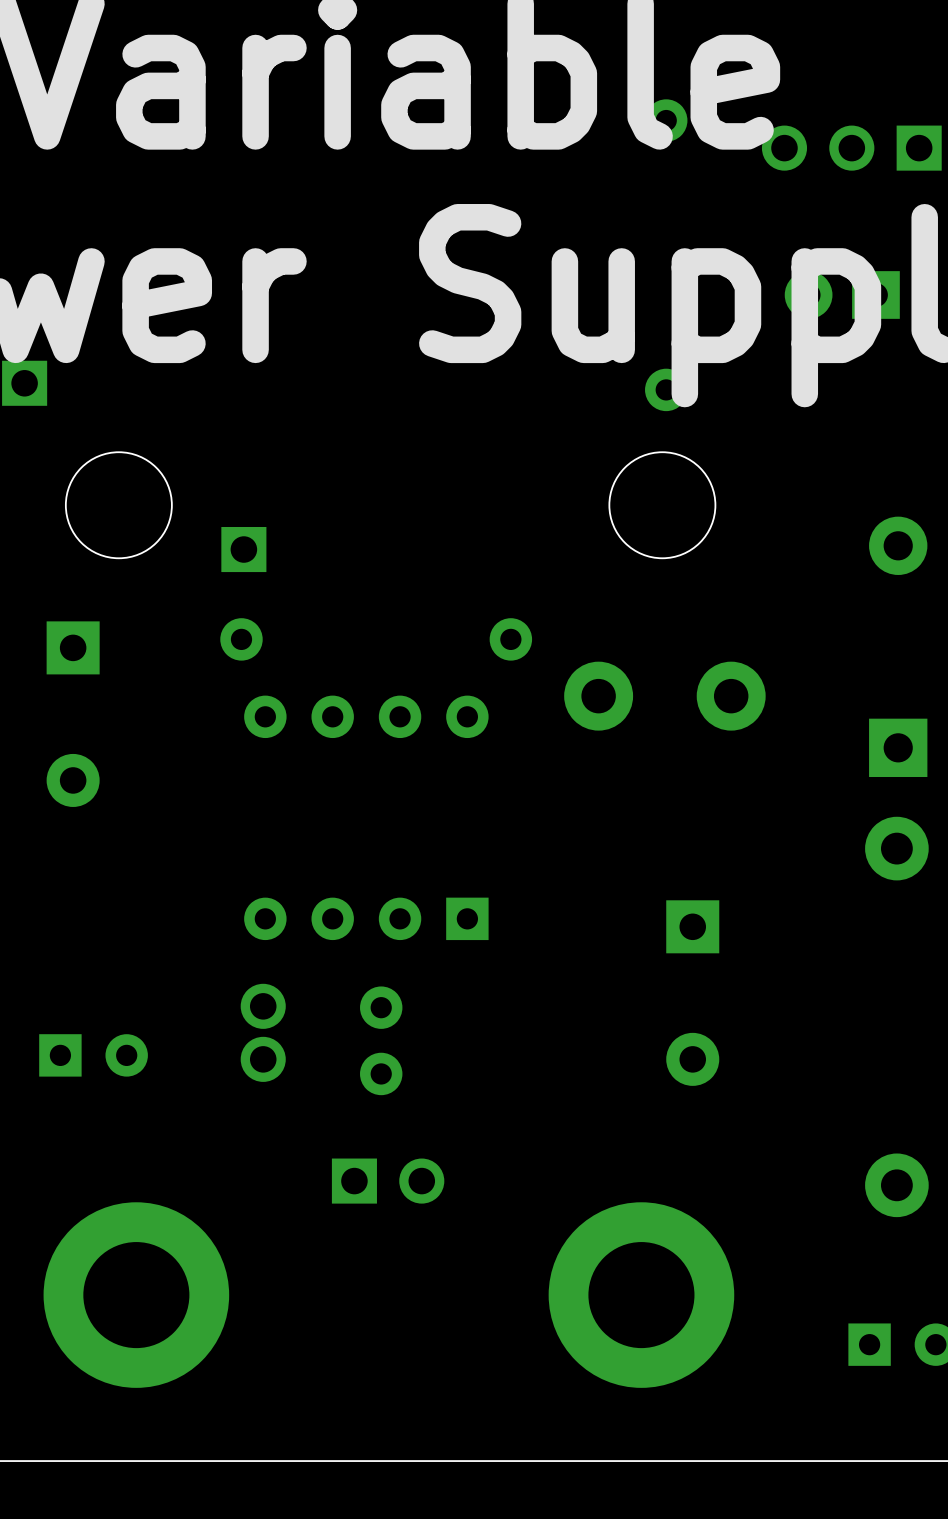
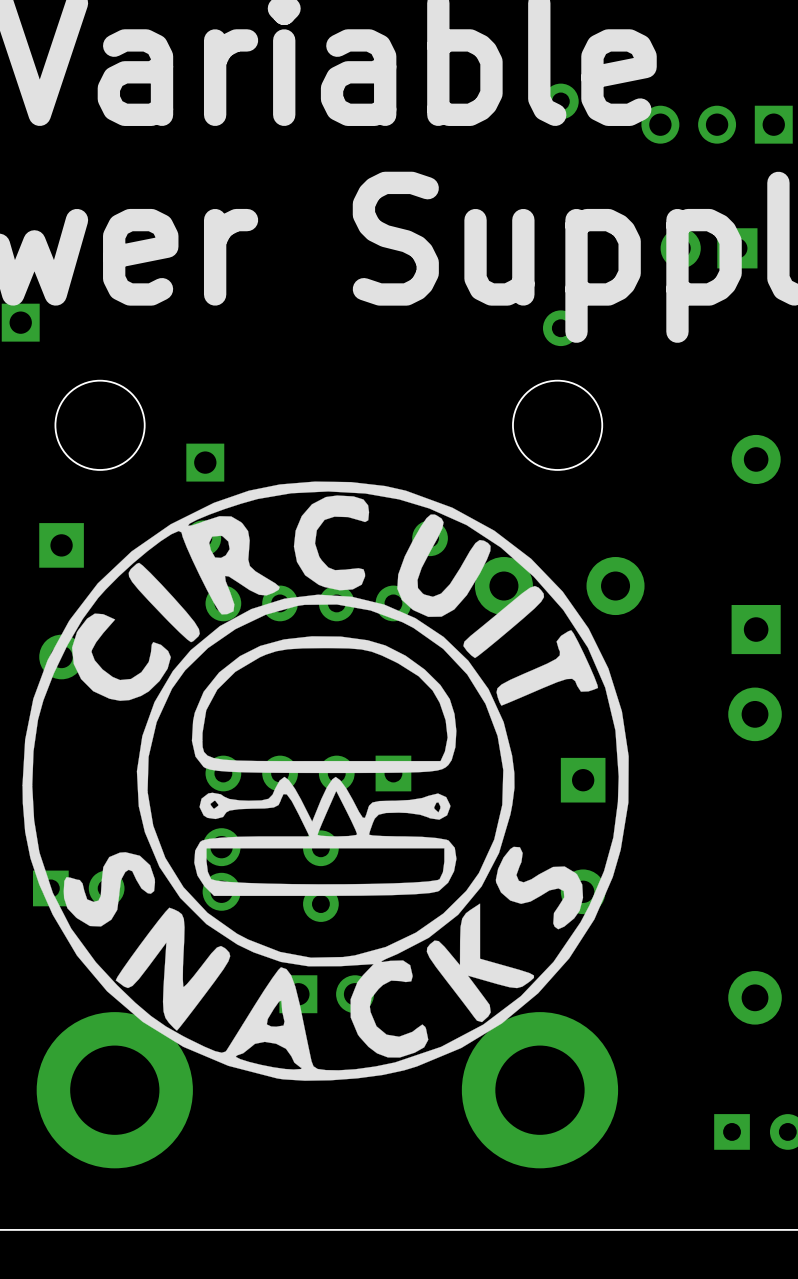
drawing: none -> [22, 481, 629, 1081]

